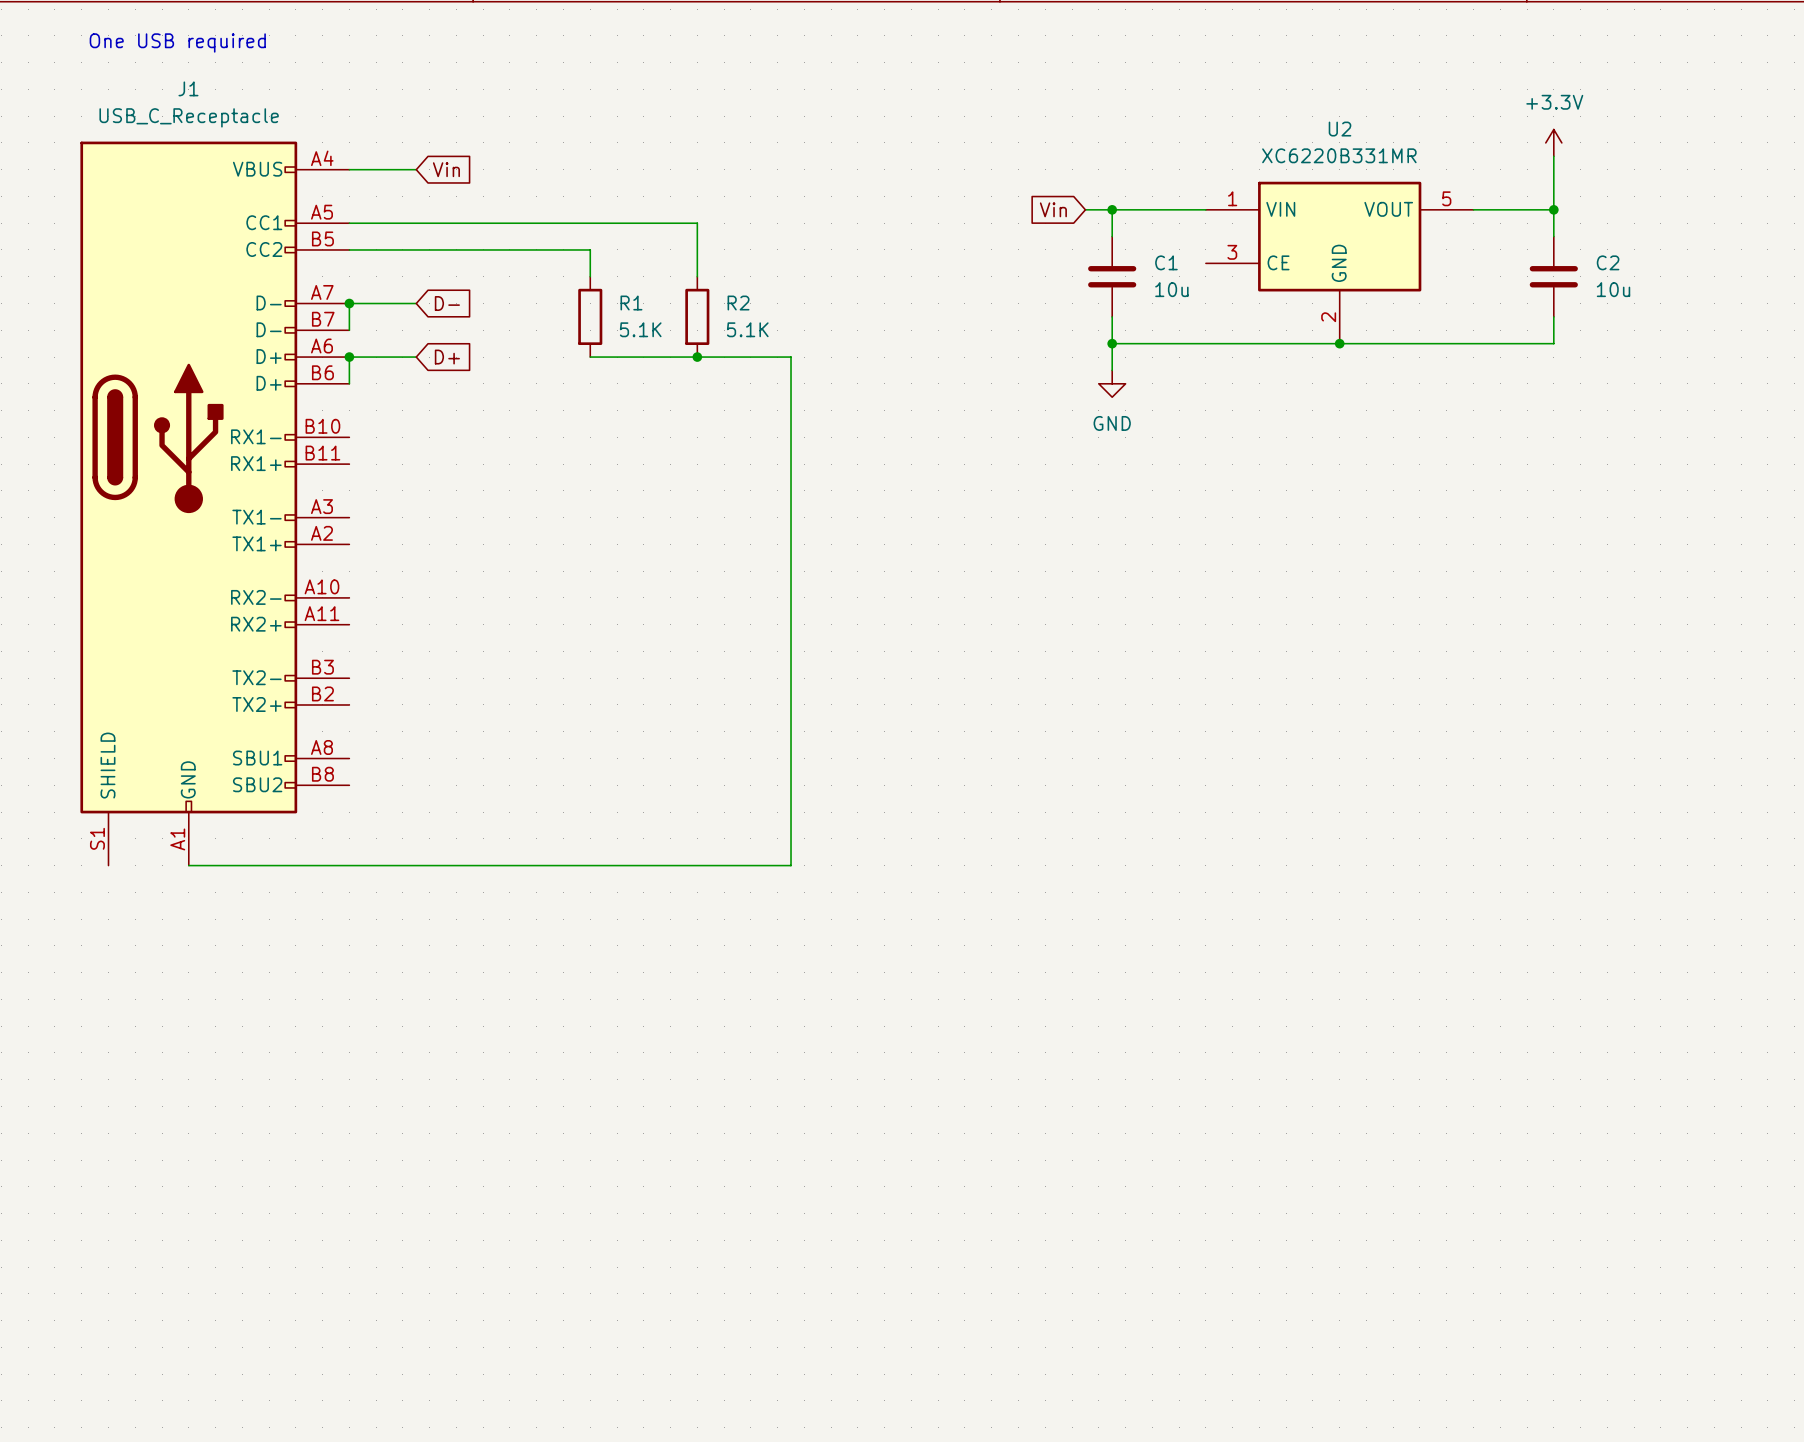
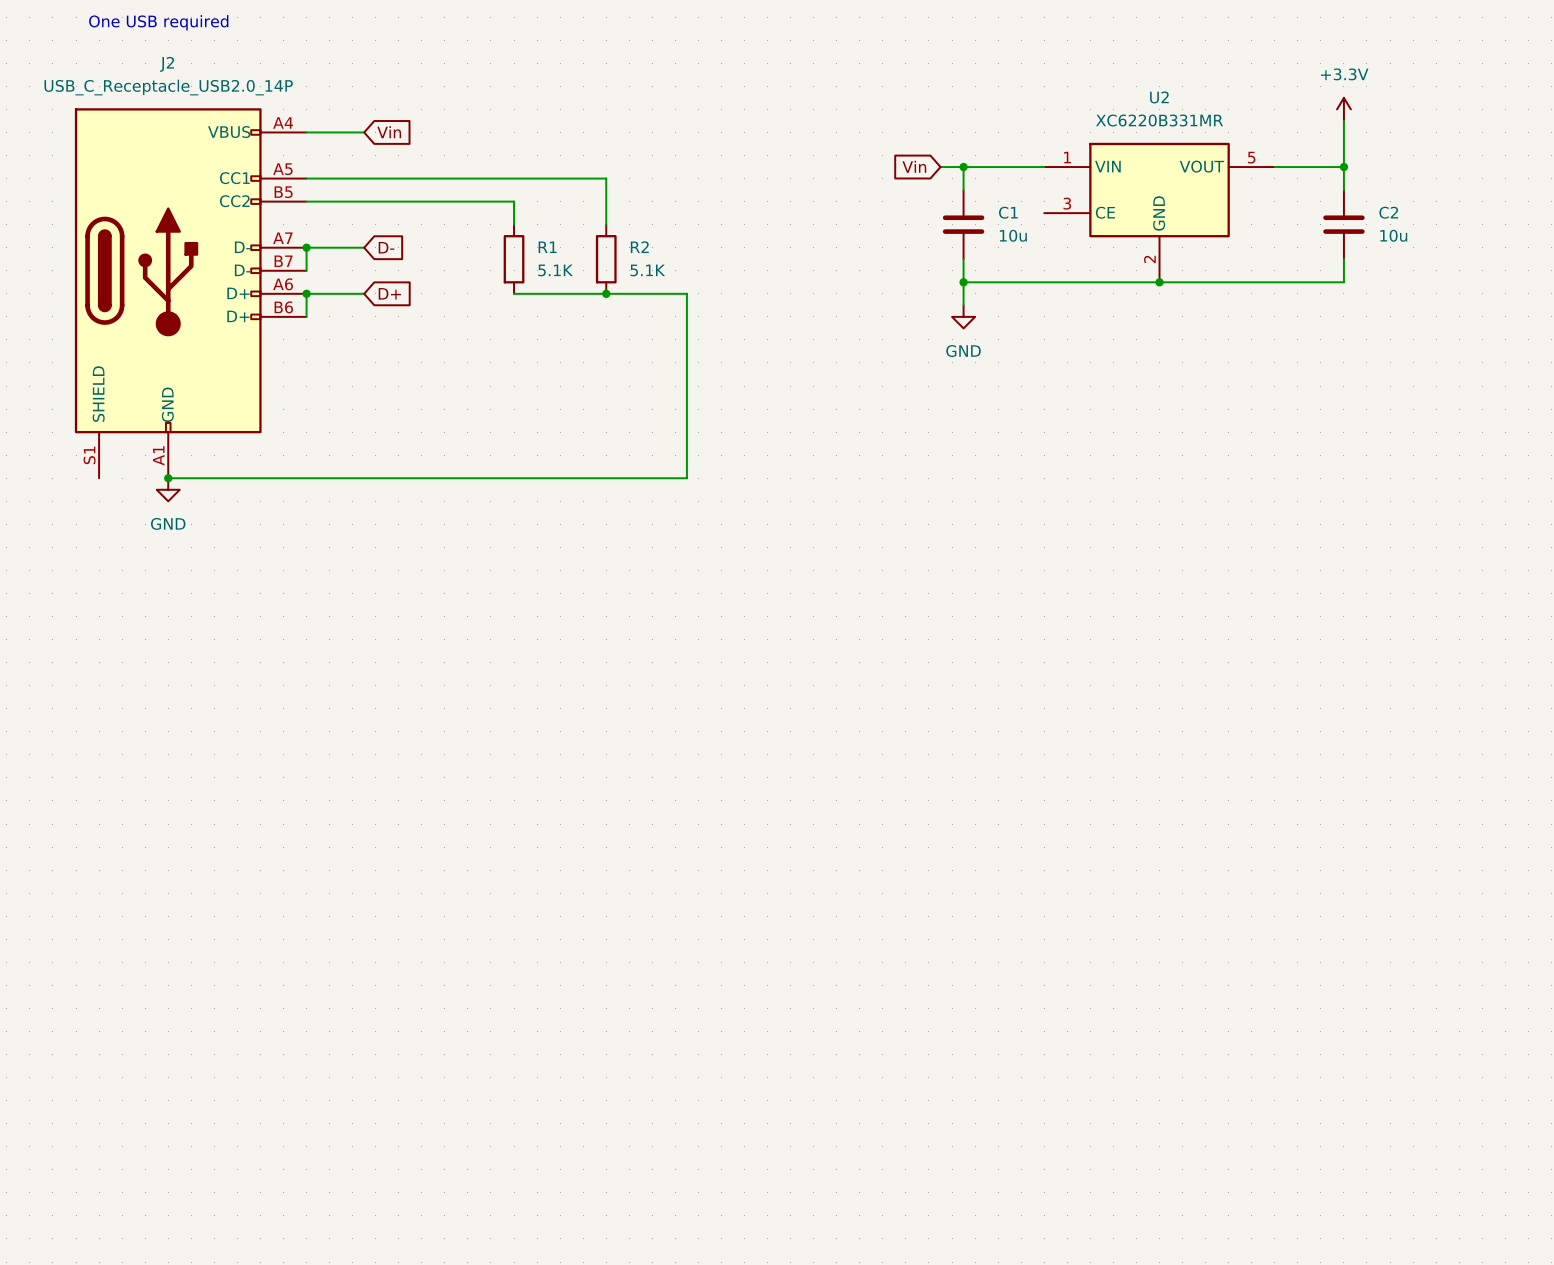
J2: none -> USB_C_Receptacle_USB2.0_14P (190, 293)
J1: USB_C_Receptacle (214, 503) -> none
junction: none -> (168, 478)
wire: (791, 571) (791, 865) (188, 865) -> (686, 478) (168, 478)
power symbol: none -> GND (168, 489)

